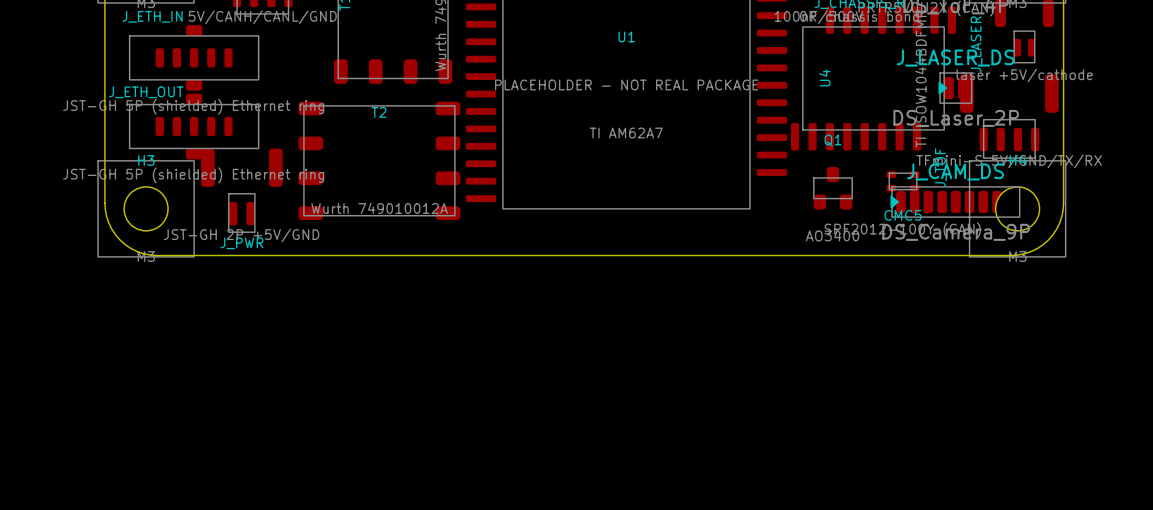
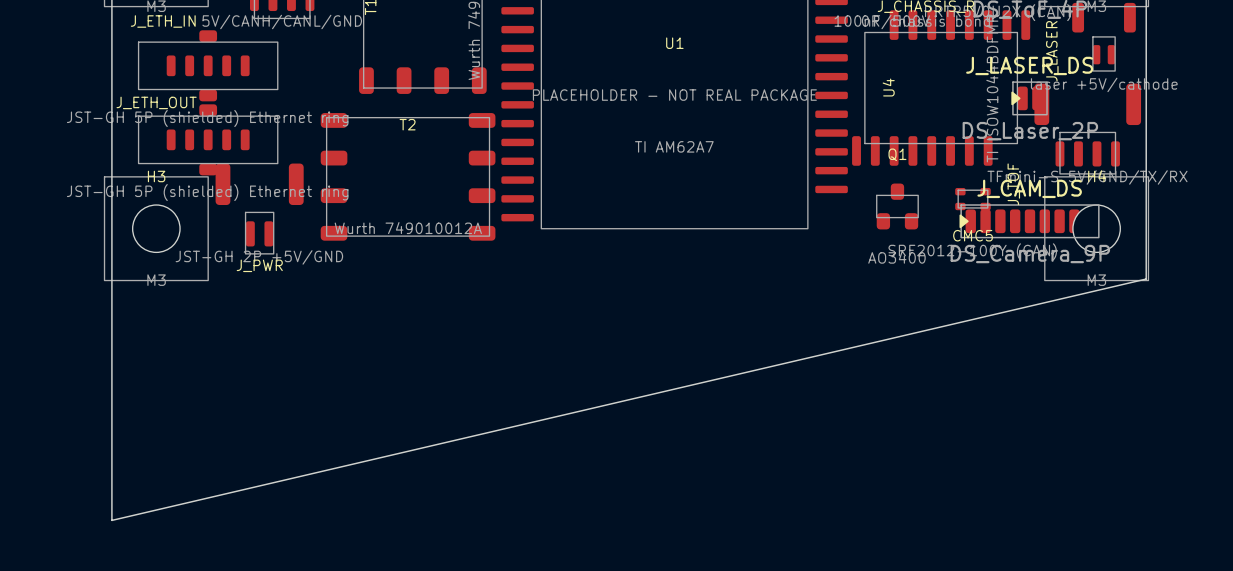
board edge: (104, 203) (108, 223) (120, 240) (137, 251) (157, 255) (1011, 255) (1031, 251) (1048, 240) (1059, 223) (1063, 203) -> (111, 222) (111, 520) (1146, 279) (1146, 222)

